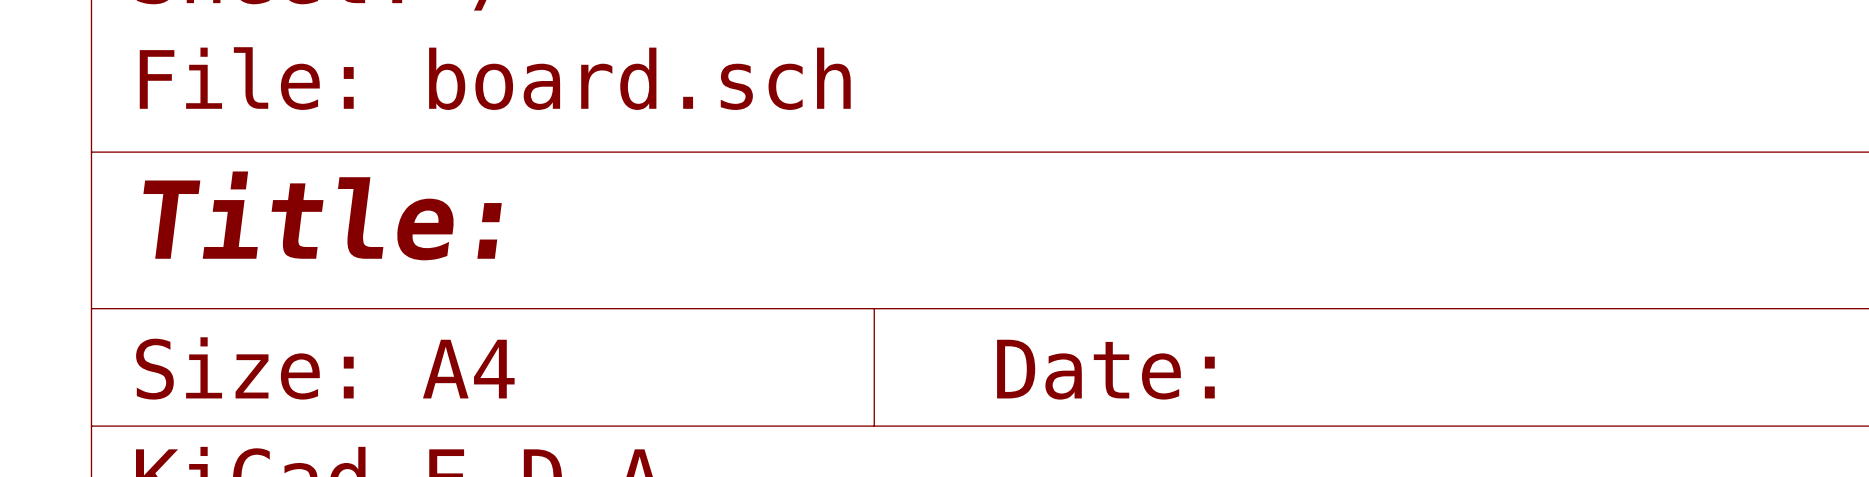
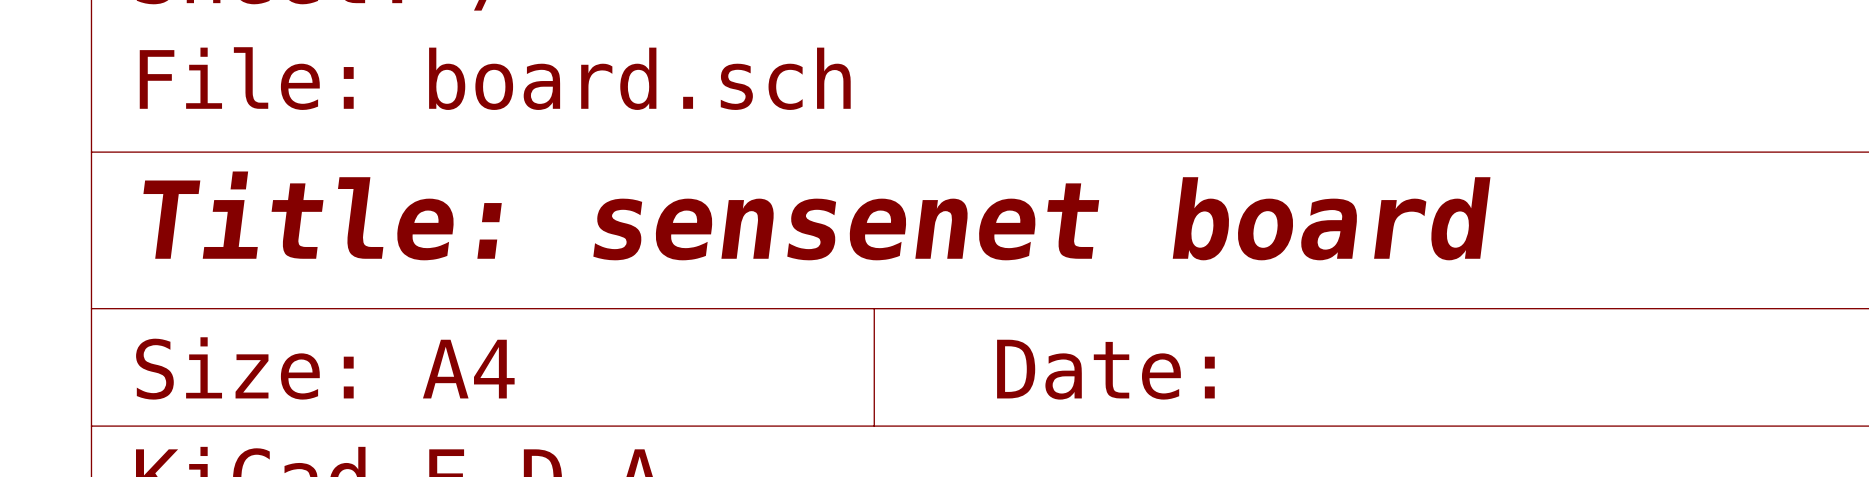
title block: Title: (322, 215) -> Title: sensenet board (816, 215)

